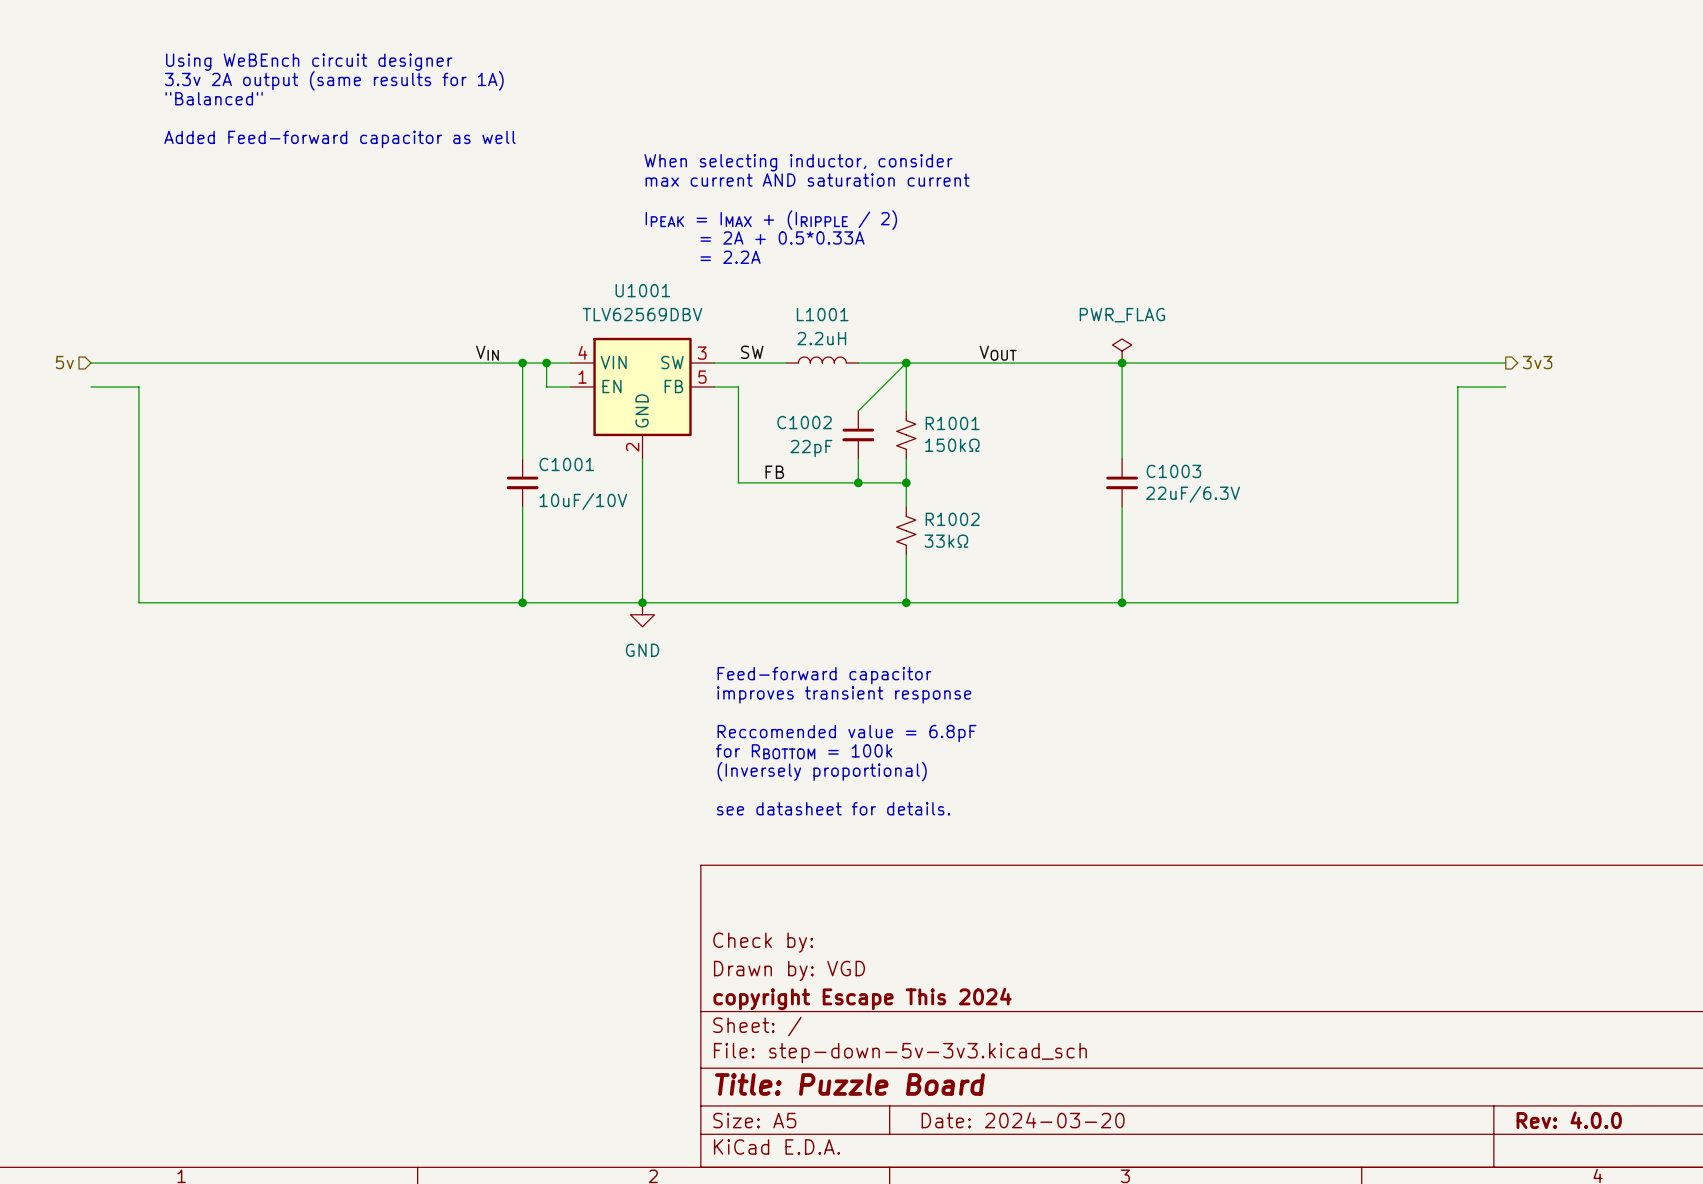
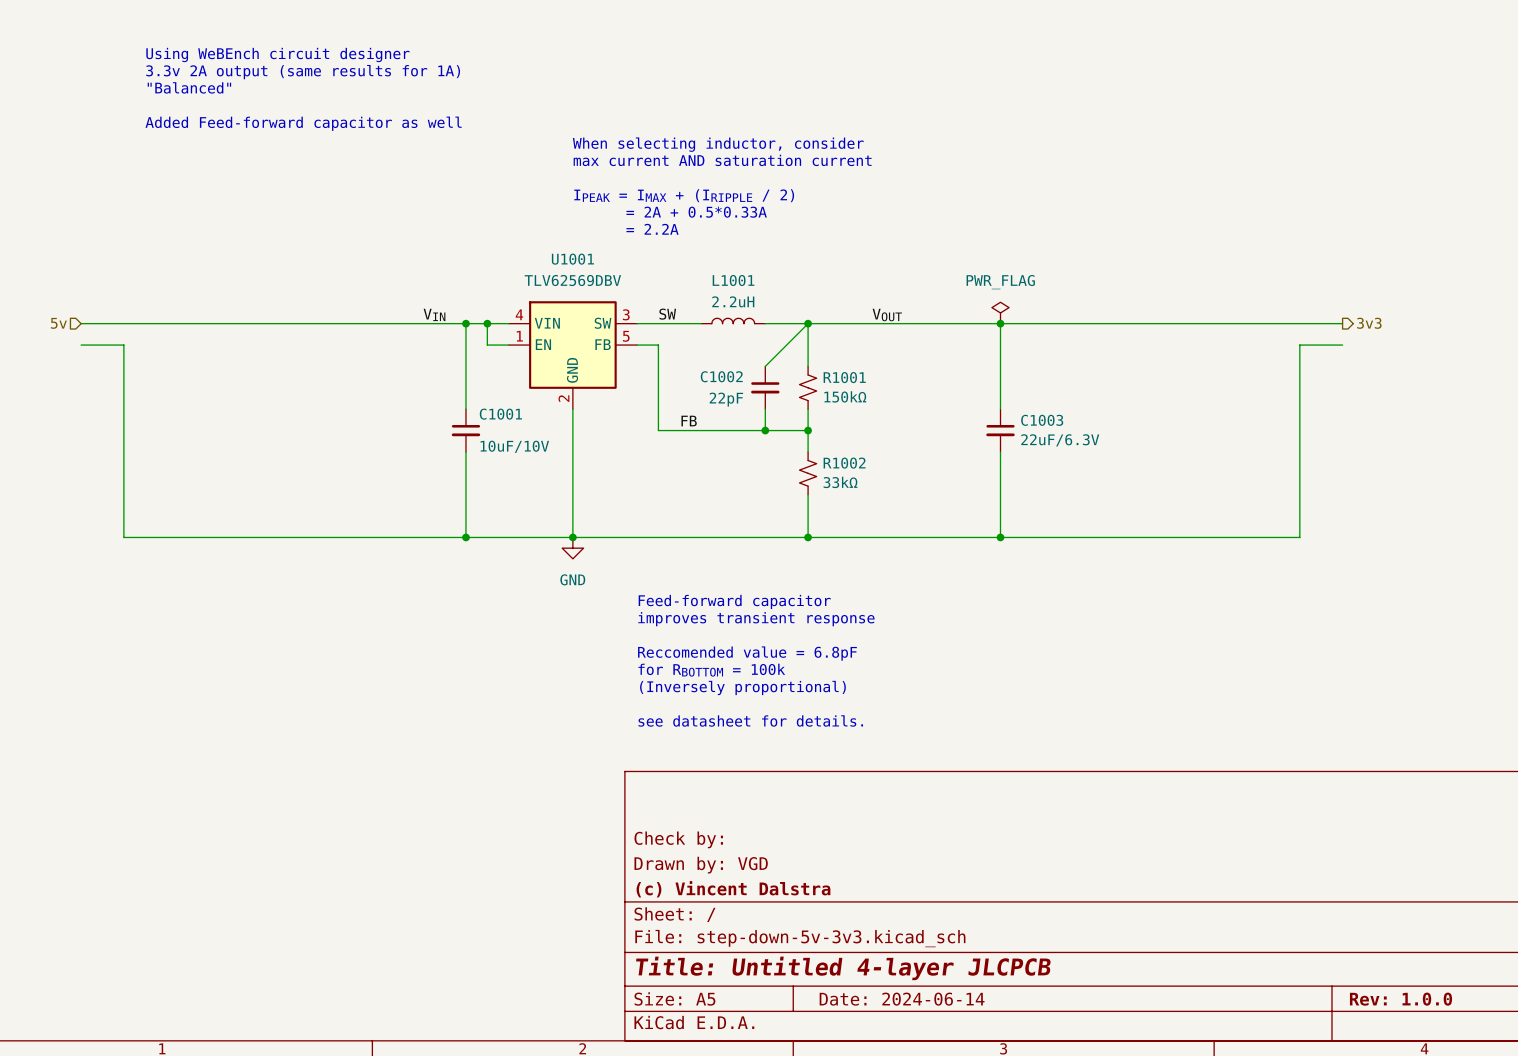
title block: copyright Escape This 2024 (862, 998) -> (c) Vincent Dalstra (733, 889)
title block: Title: Puzzle Board (850, 1084) -> Title: Untitled 4-layer JLCPCB (843, 968)
title block: Date: 2024-03-20 (1023, 1120) -> Date: 2024-06-14 (902, 999)
title block: Rev: 4.0.0 (1569, 1120) -> Rev: 1.0.0 (1401, 999)

